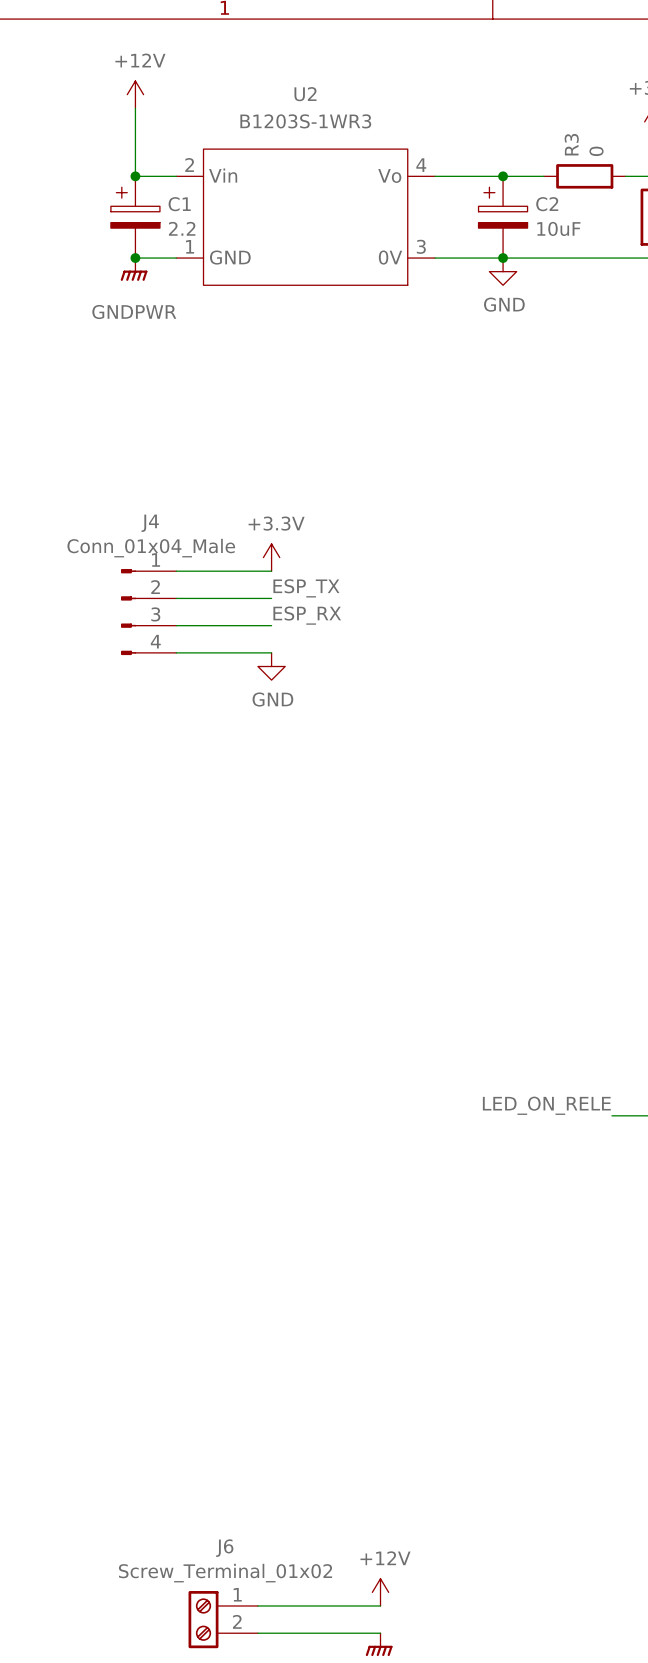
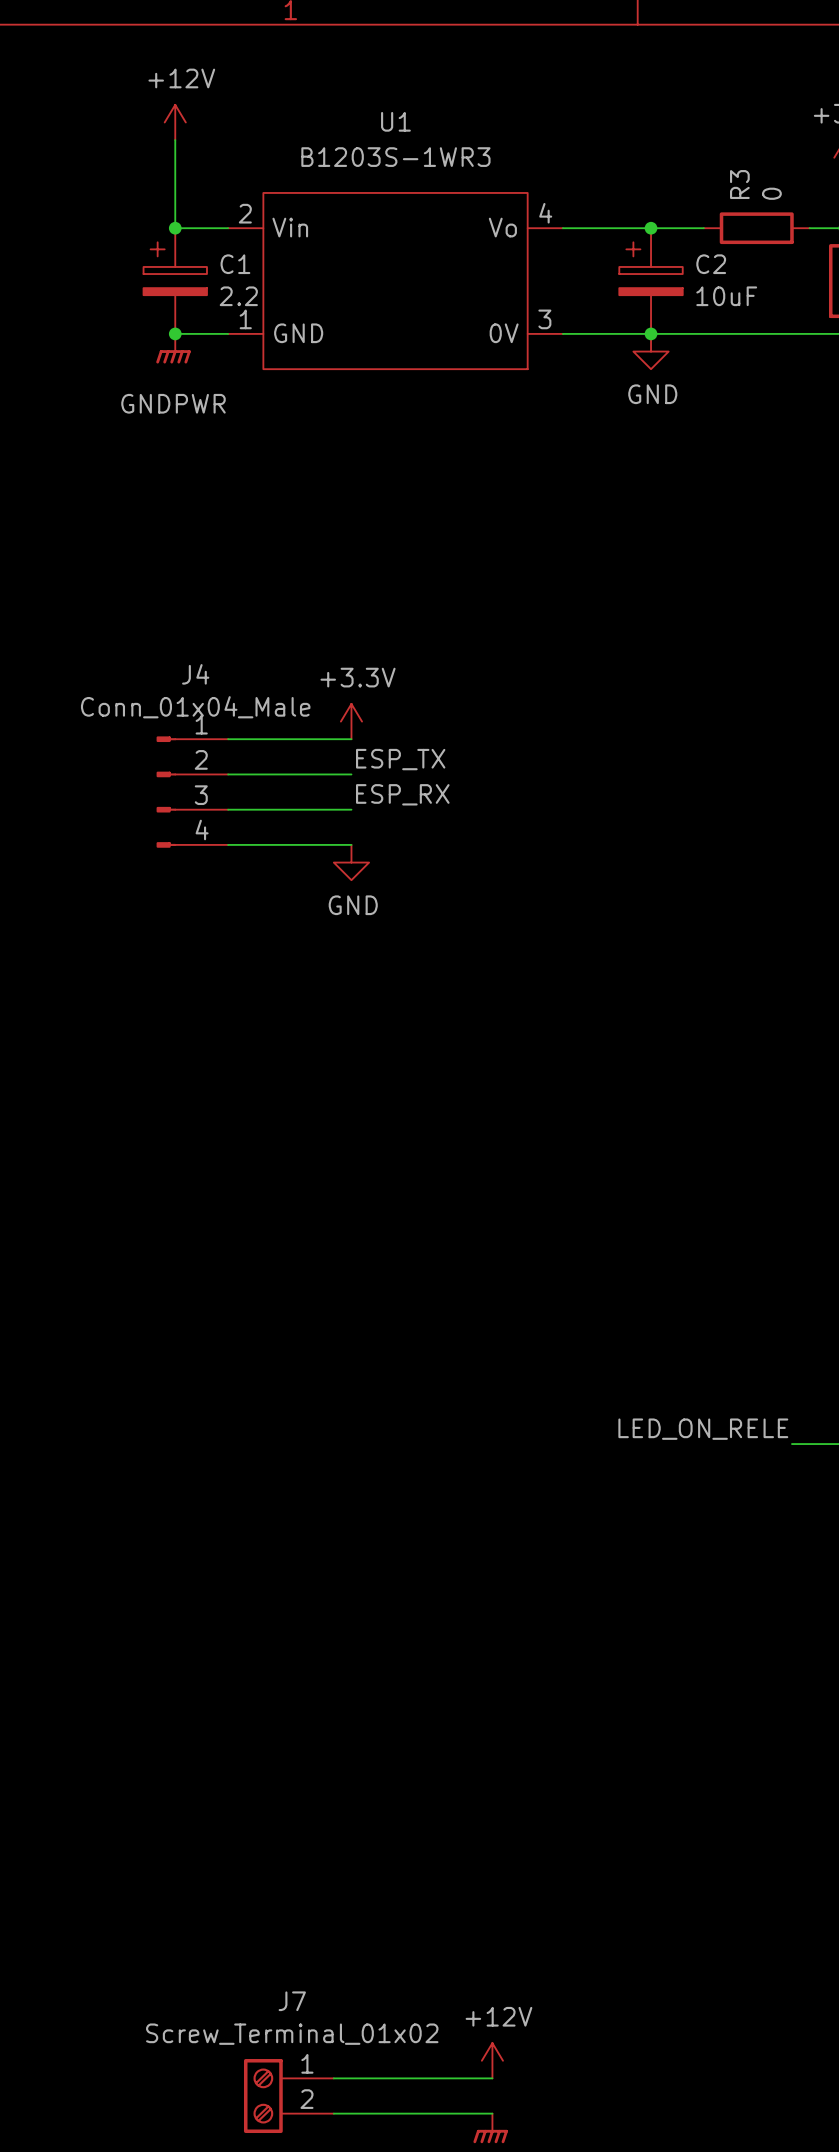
U2 name: U2 (305, 94) -> U1 (395, 121)
J6 name: J6 (224, 1548) -> J7 (292, 2001)

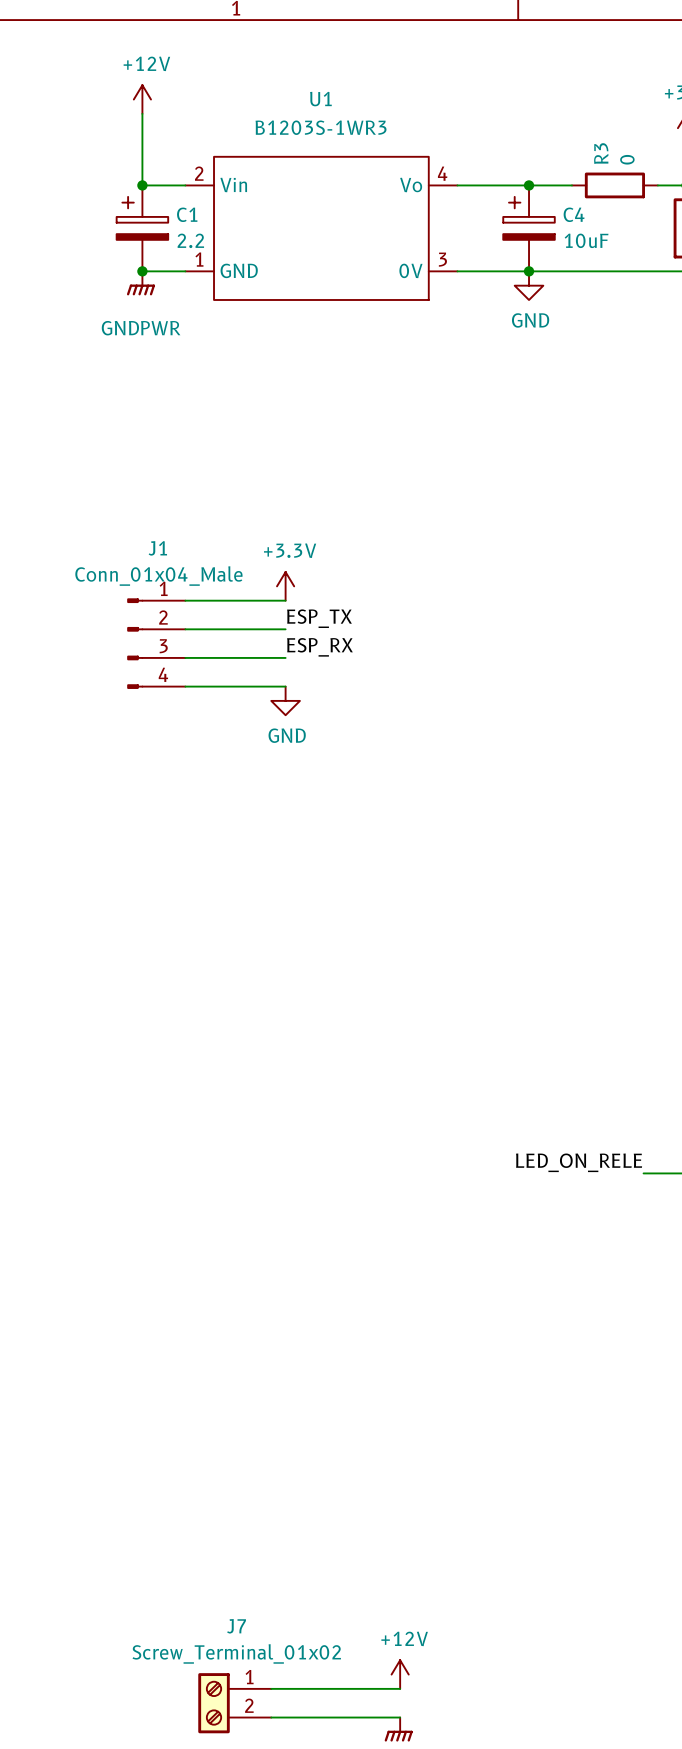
C2 name: C2 (711, 264) -> C4 (574, 214)
J4 name: J4 (195, 674) -> J1 (157, 548)

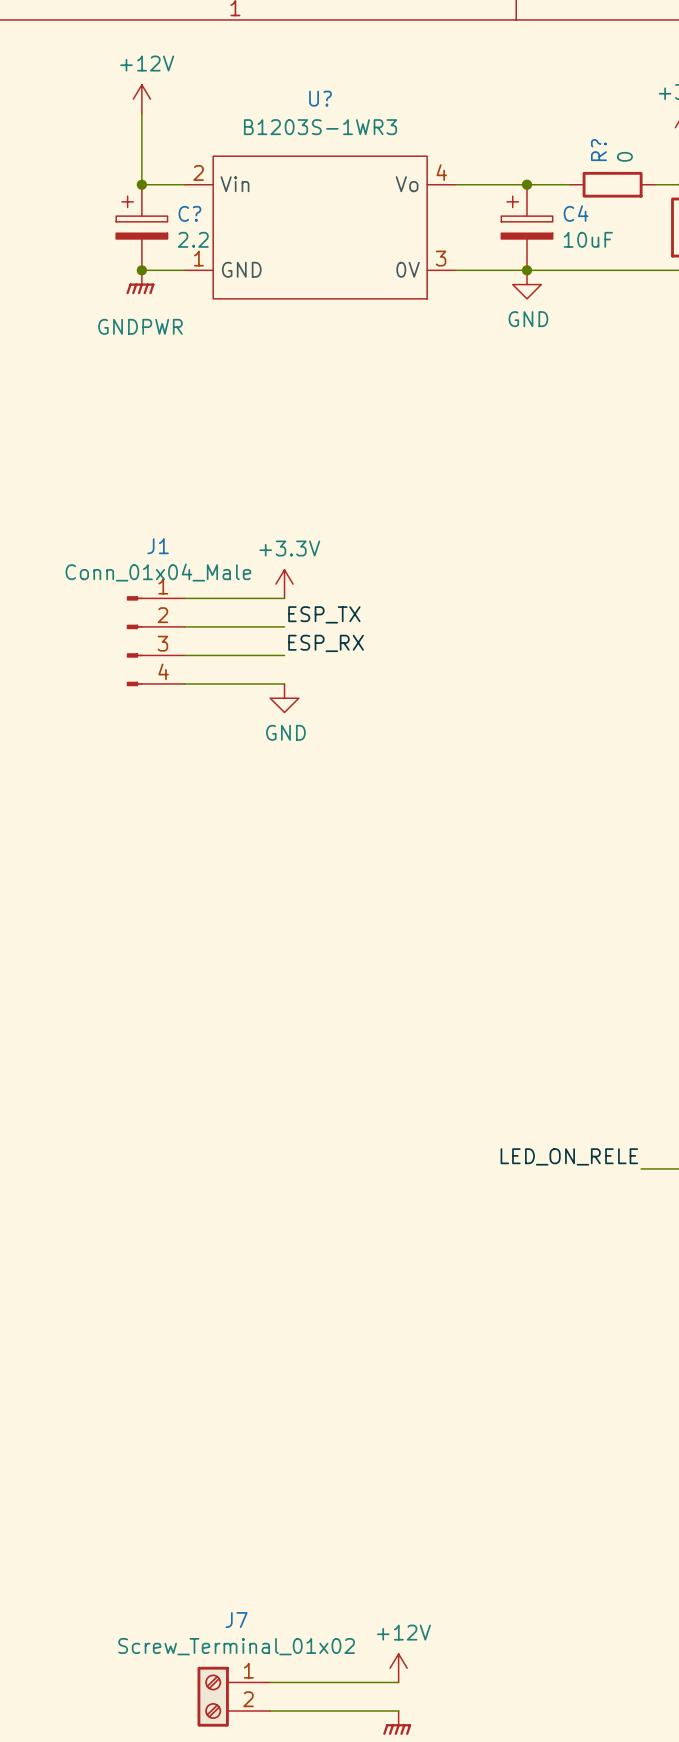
U1 name: U1 (320, 99) -> U? (320, 98)
R3 name: R3 (601, 153) -> R? (598, 150)
C1 name: C1 (187, 214) -> C? (189, 213)

